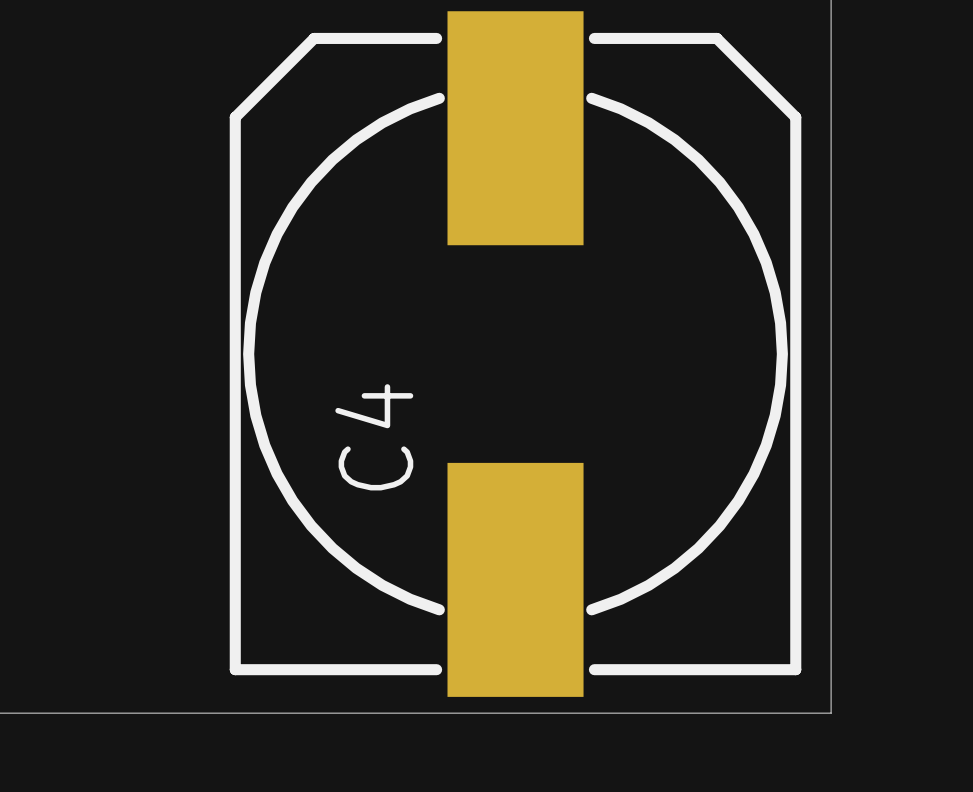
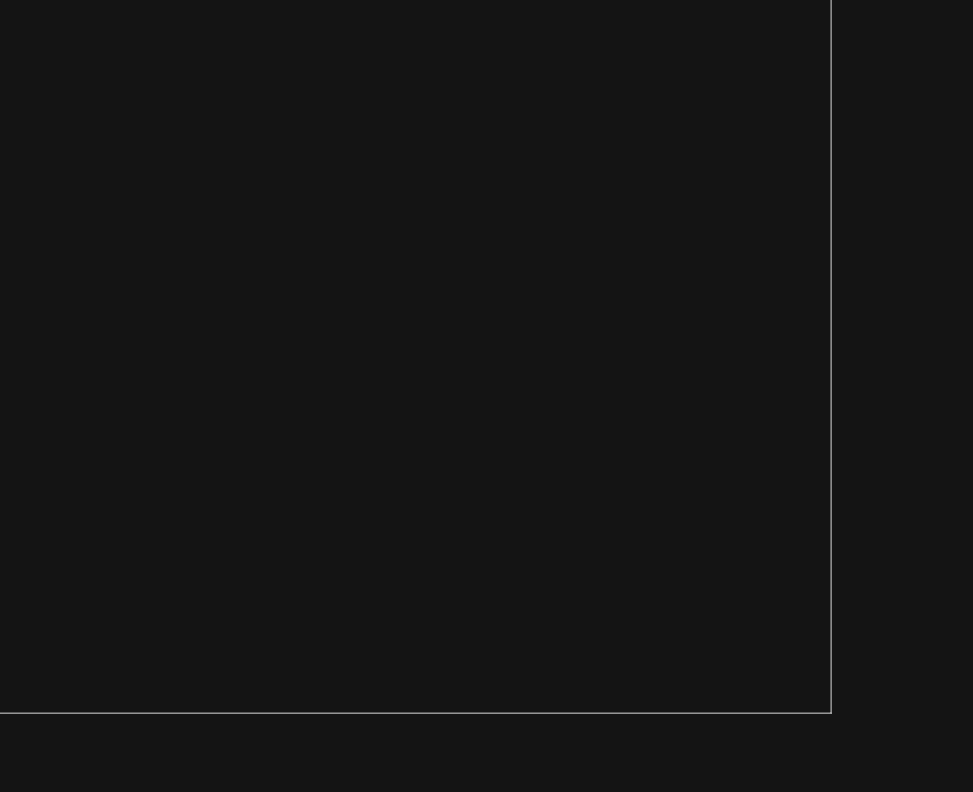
C4: (515, 354) -> none

